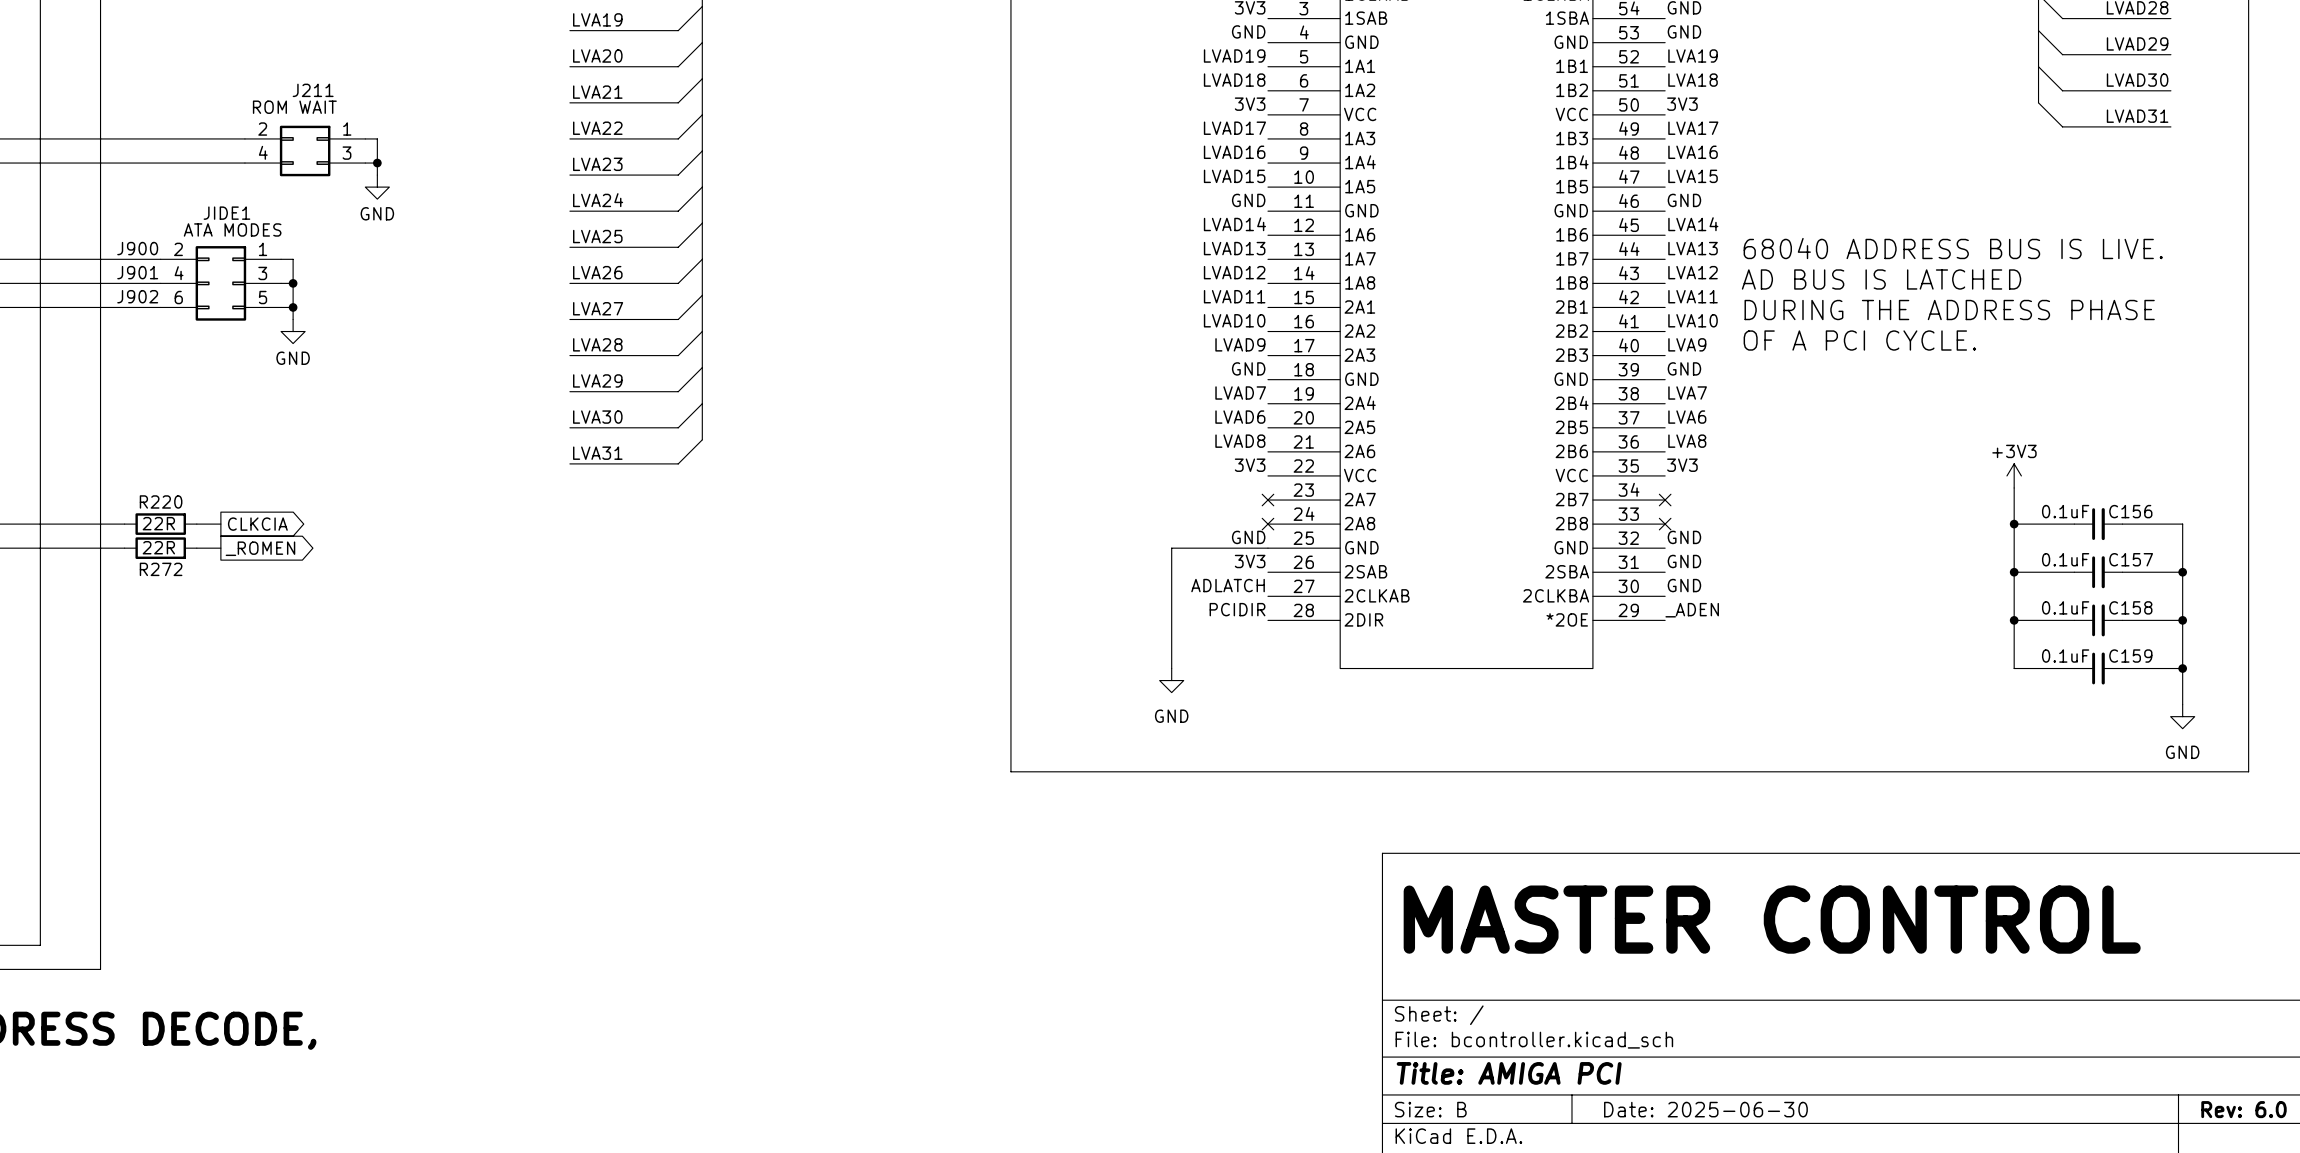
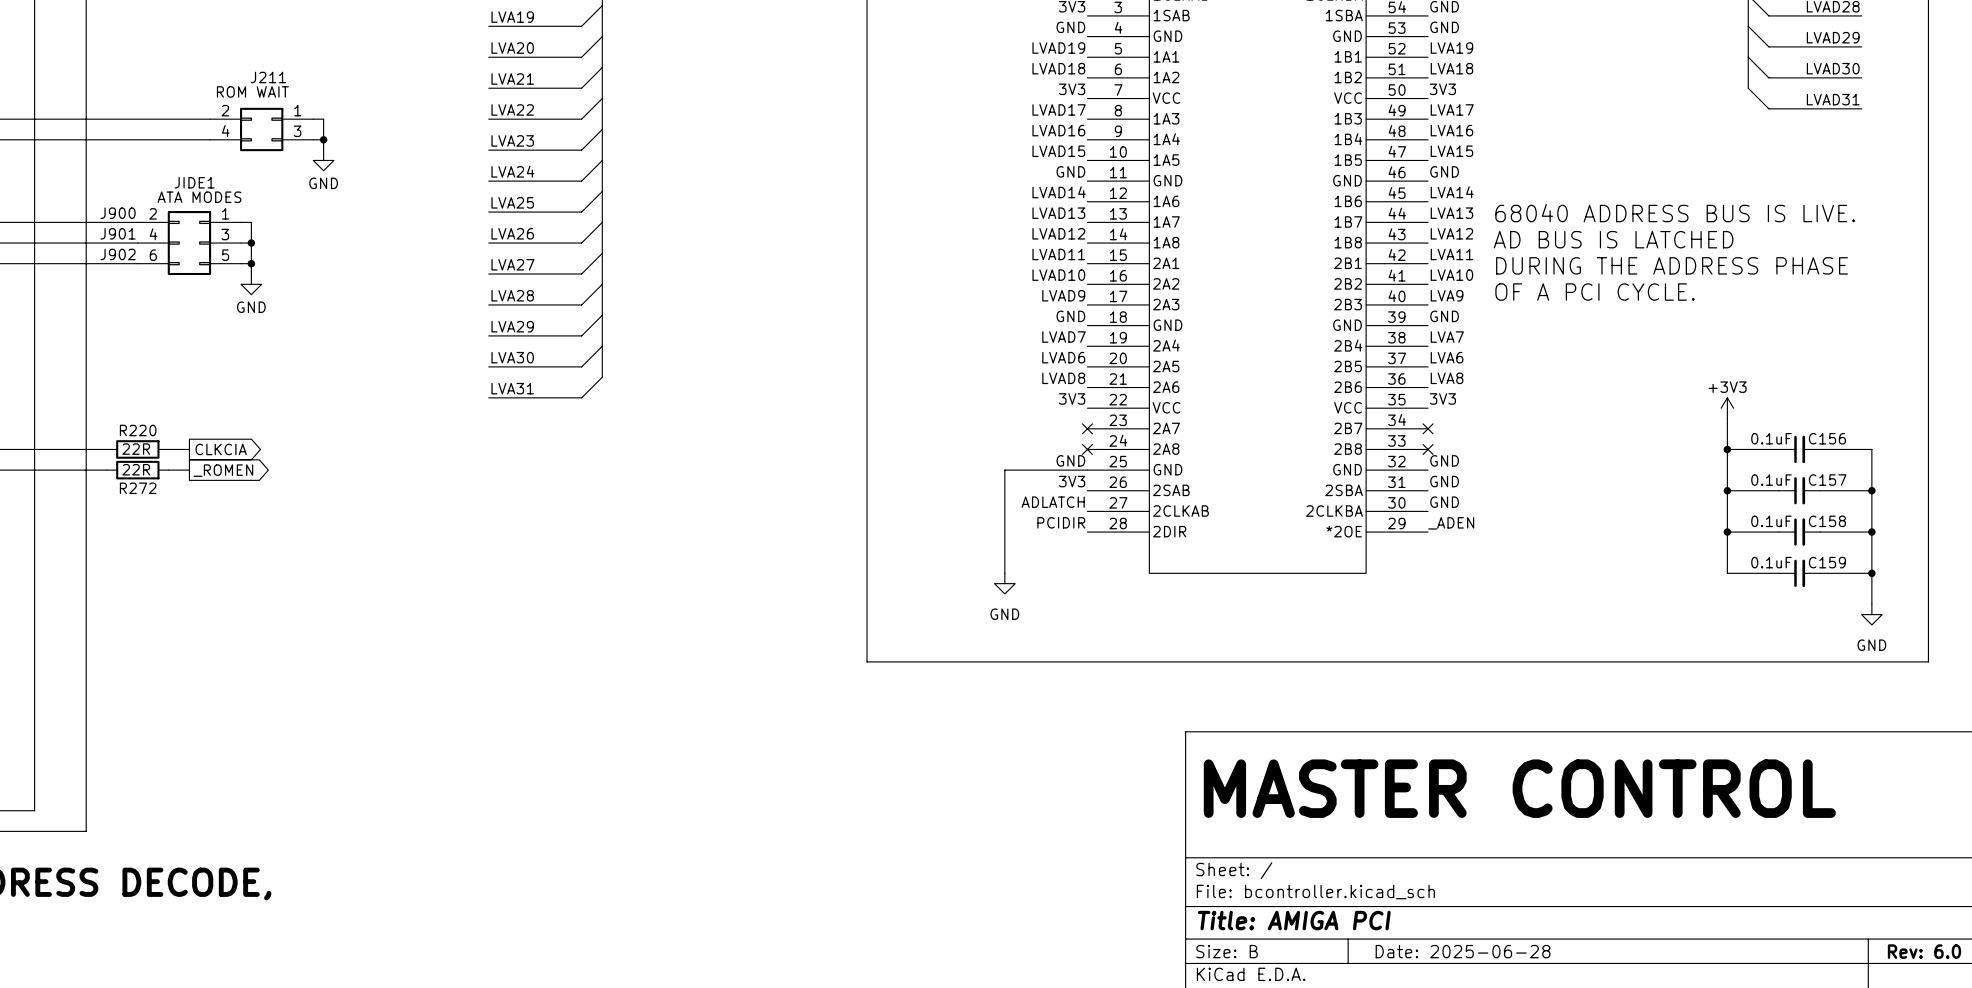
title block: Date: 2025-06-30 (1705, 1109) -> Date: 2025-06-28 (1463, 951)

